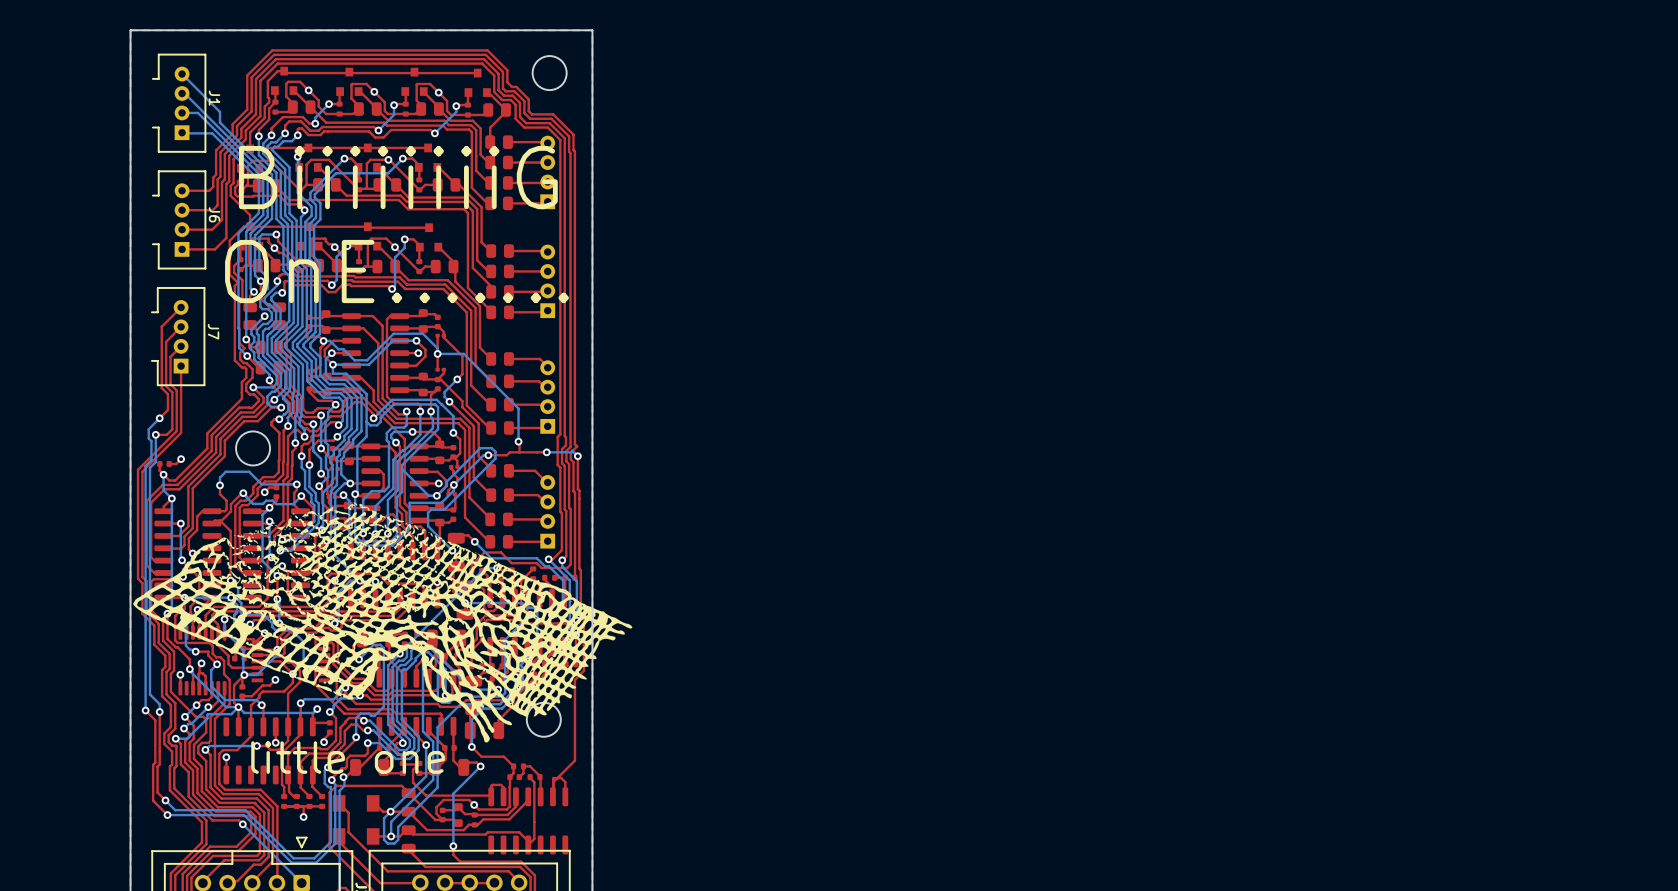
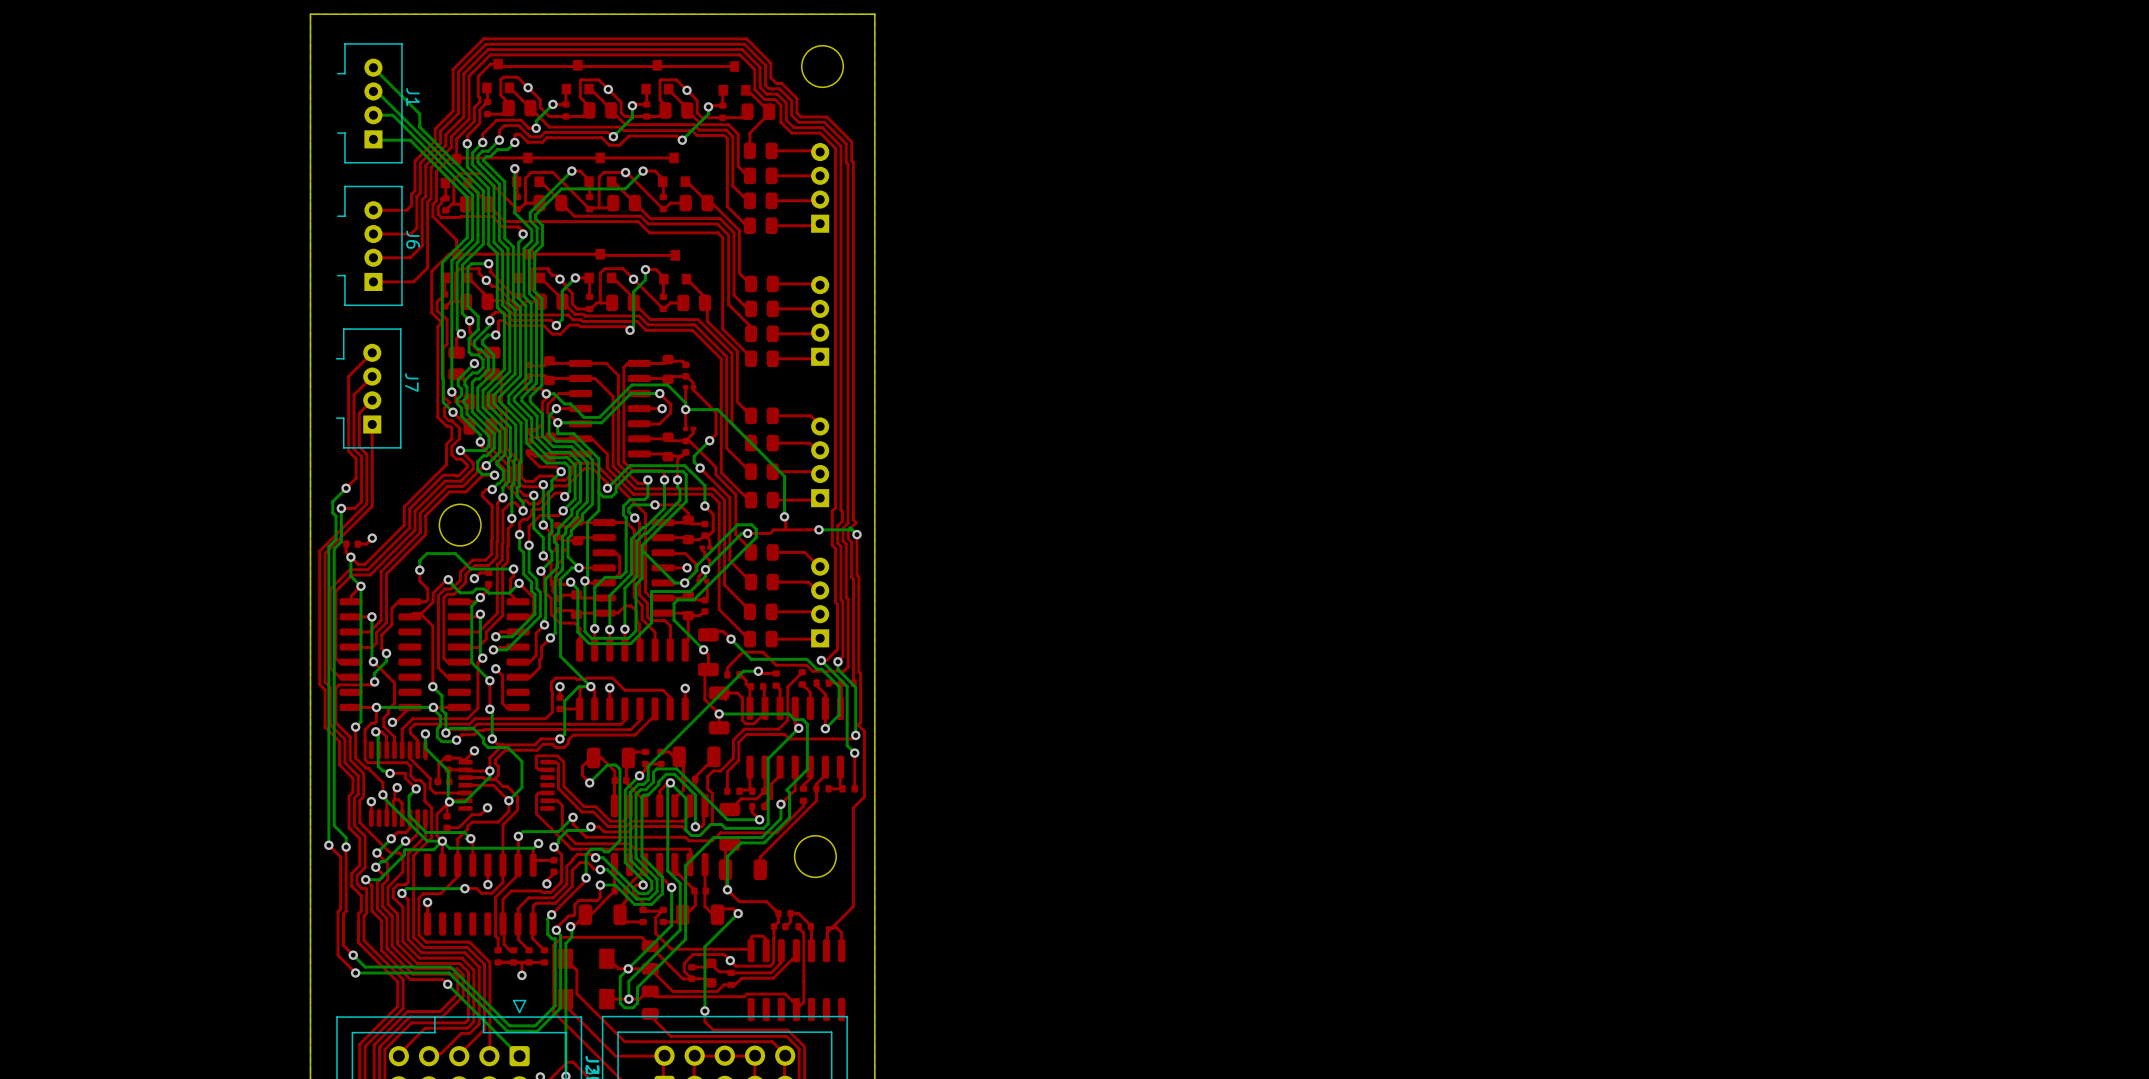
text: BiiiiiiiiG (398, 177) -> none
text: OnE....... (396, 271) -> none
drawing: [133, 502, 633, 743] -> none
text: little one (348, 757) -> none

